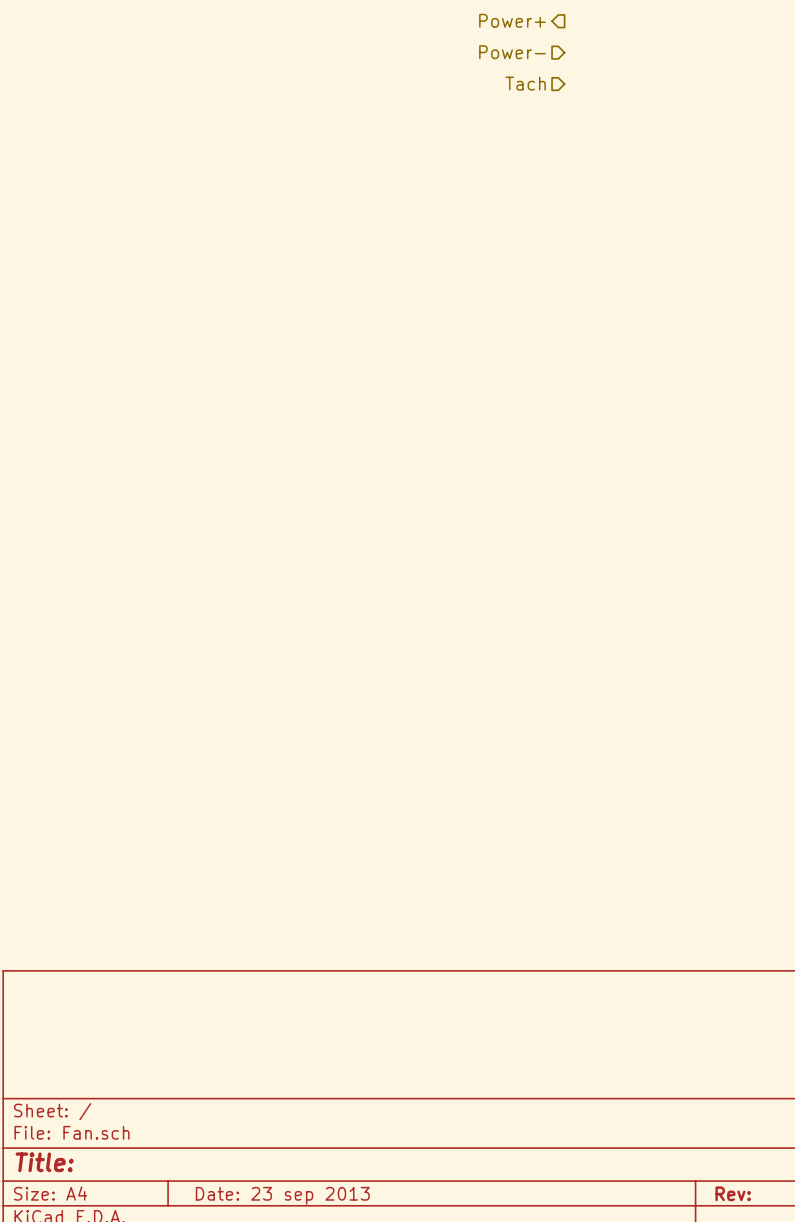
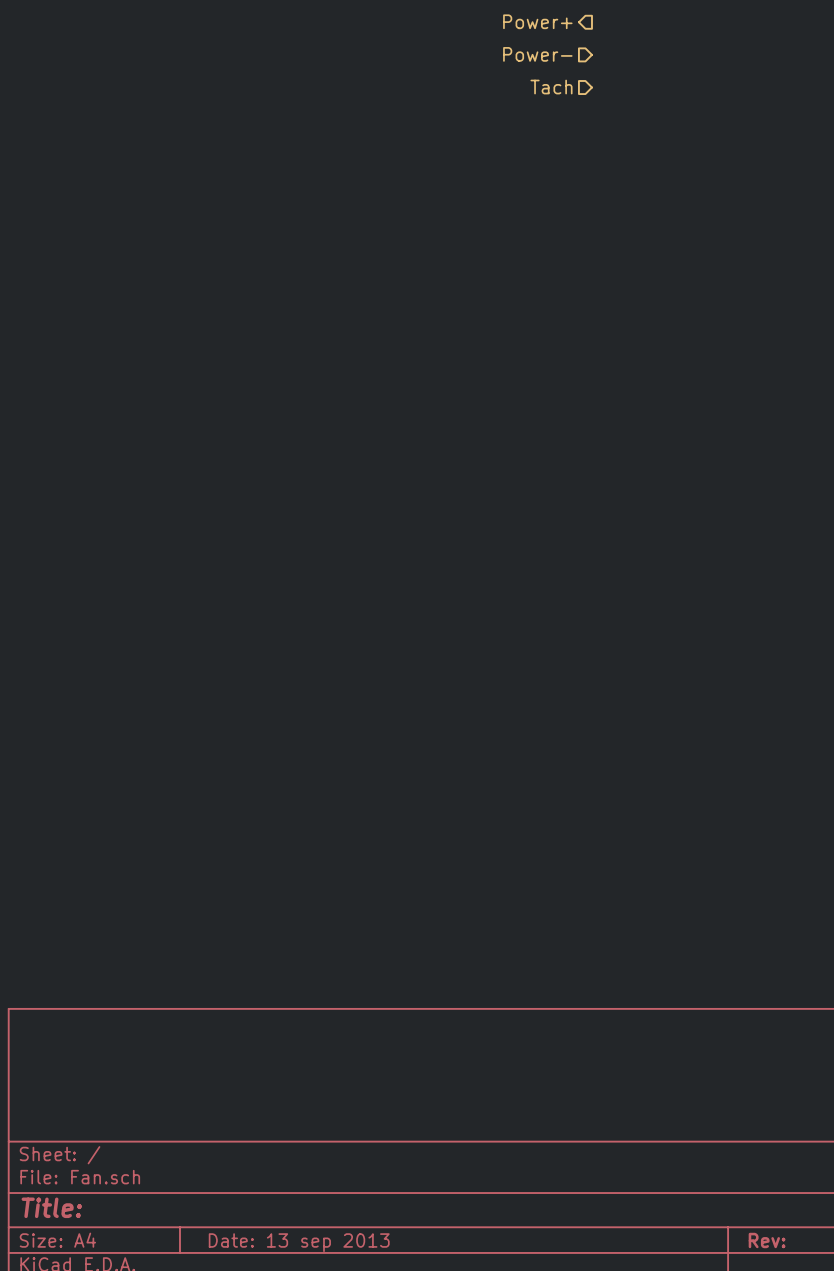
title block: Date: 23 sep 2013 (282, 1195) -> Date: 13 sep 2013 (299, 1242)

